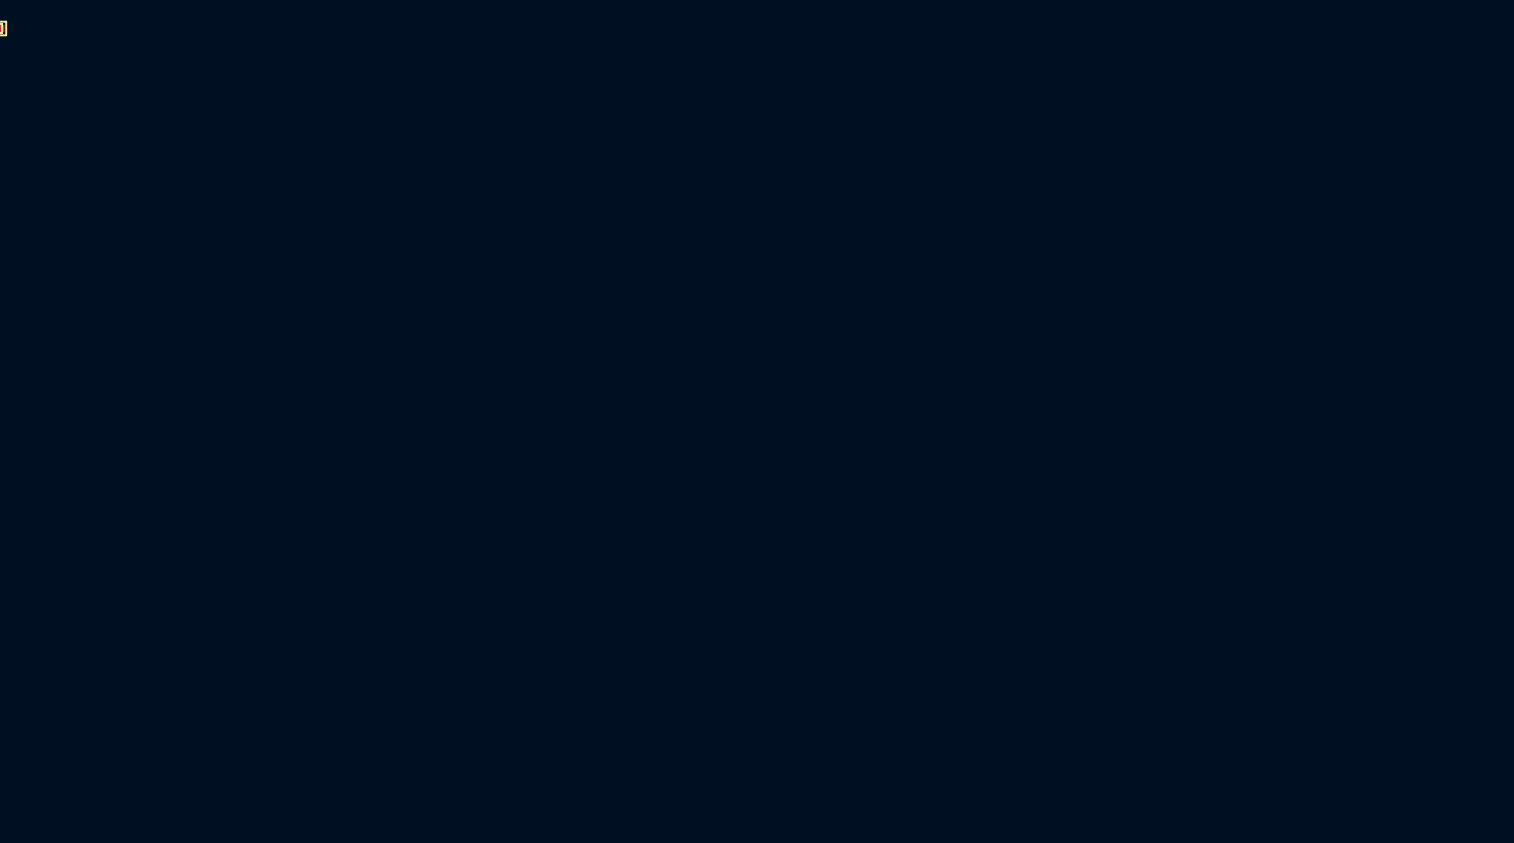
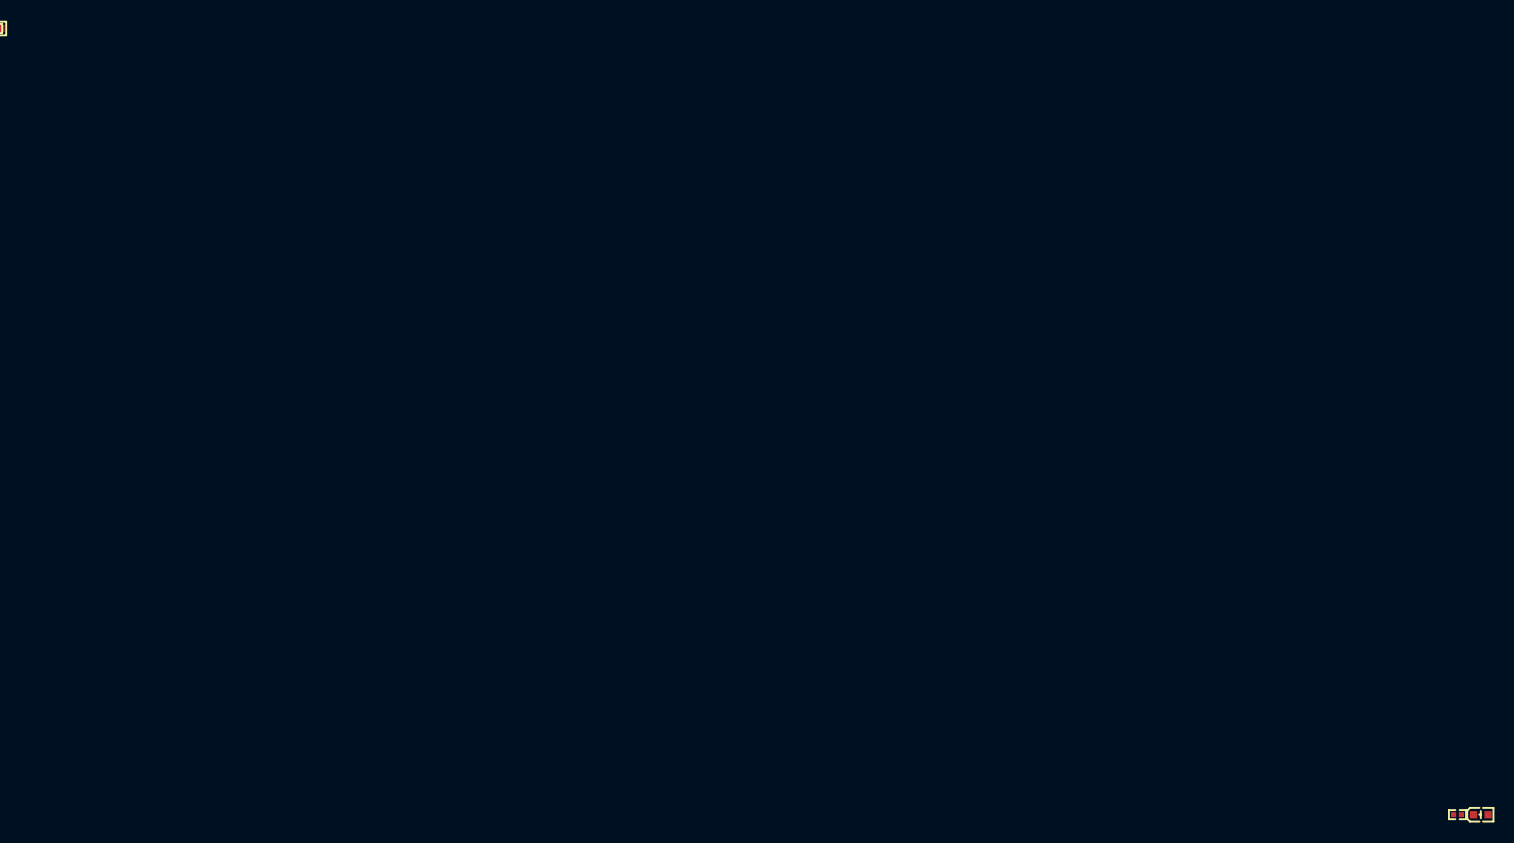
part: none -> (1457, 814)
part: none -> (1480, 814)

